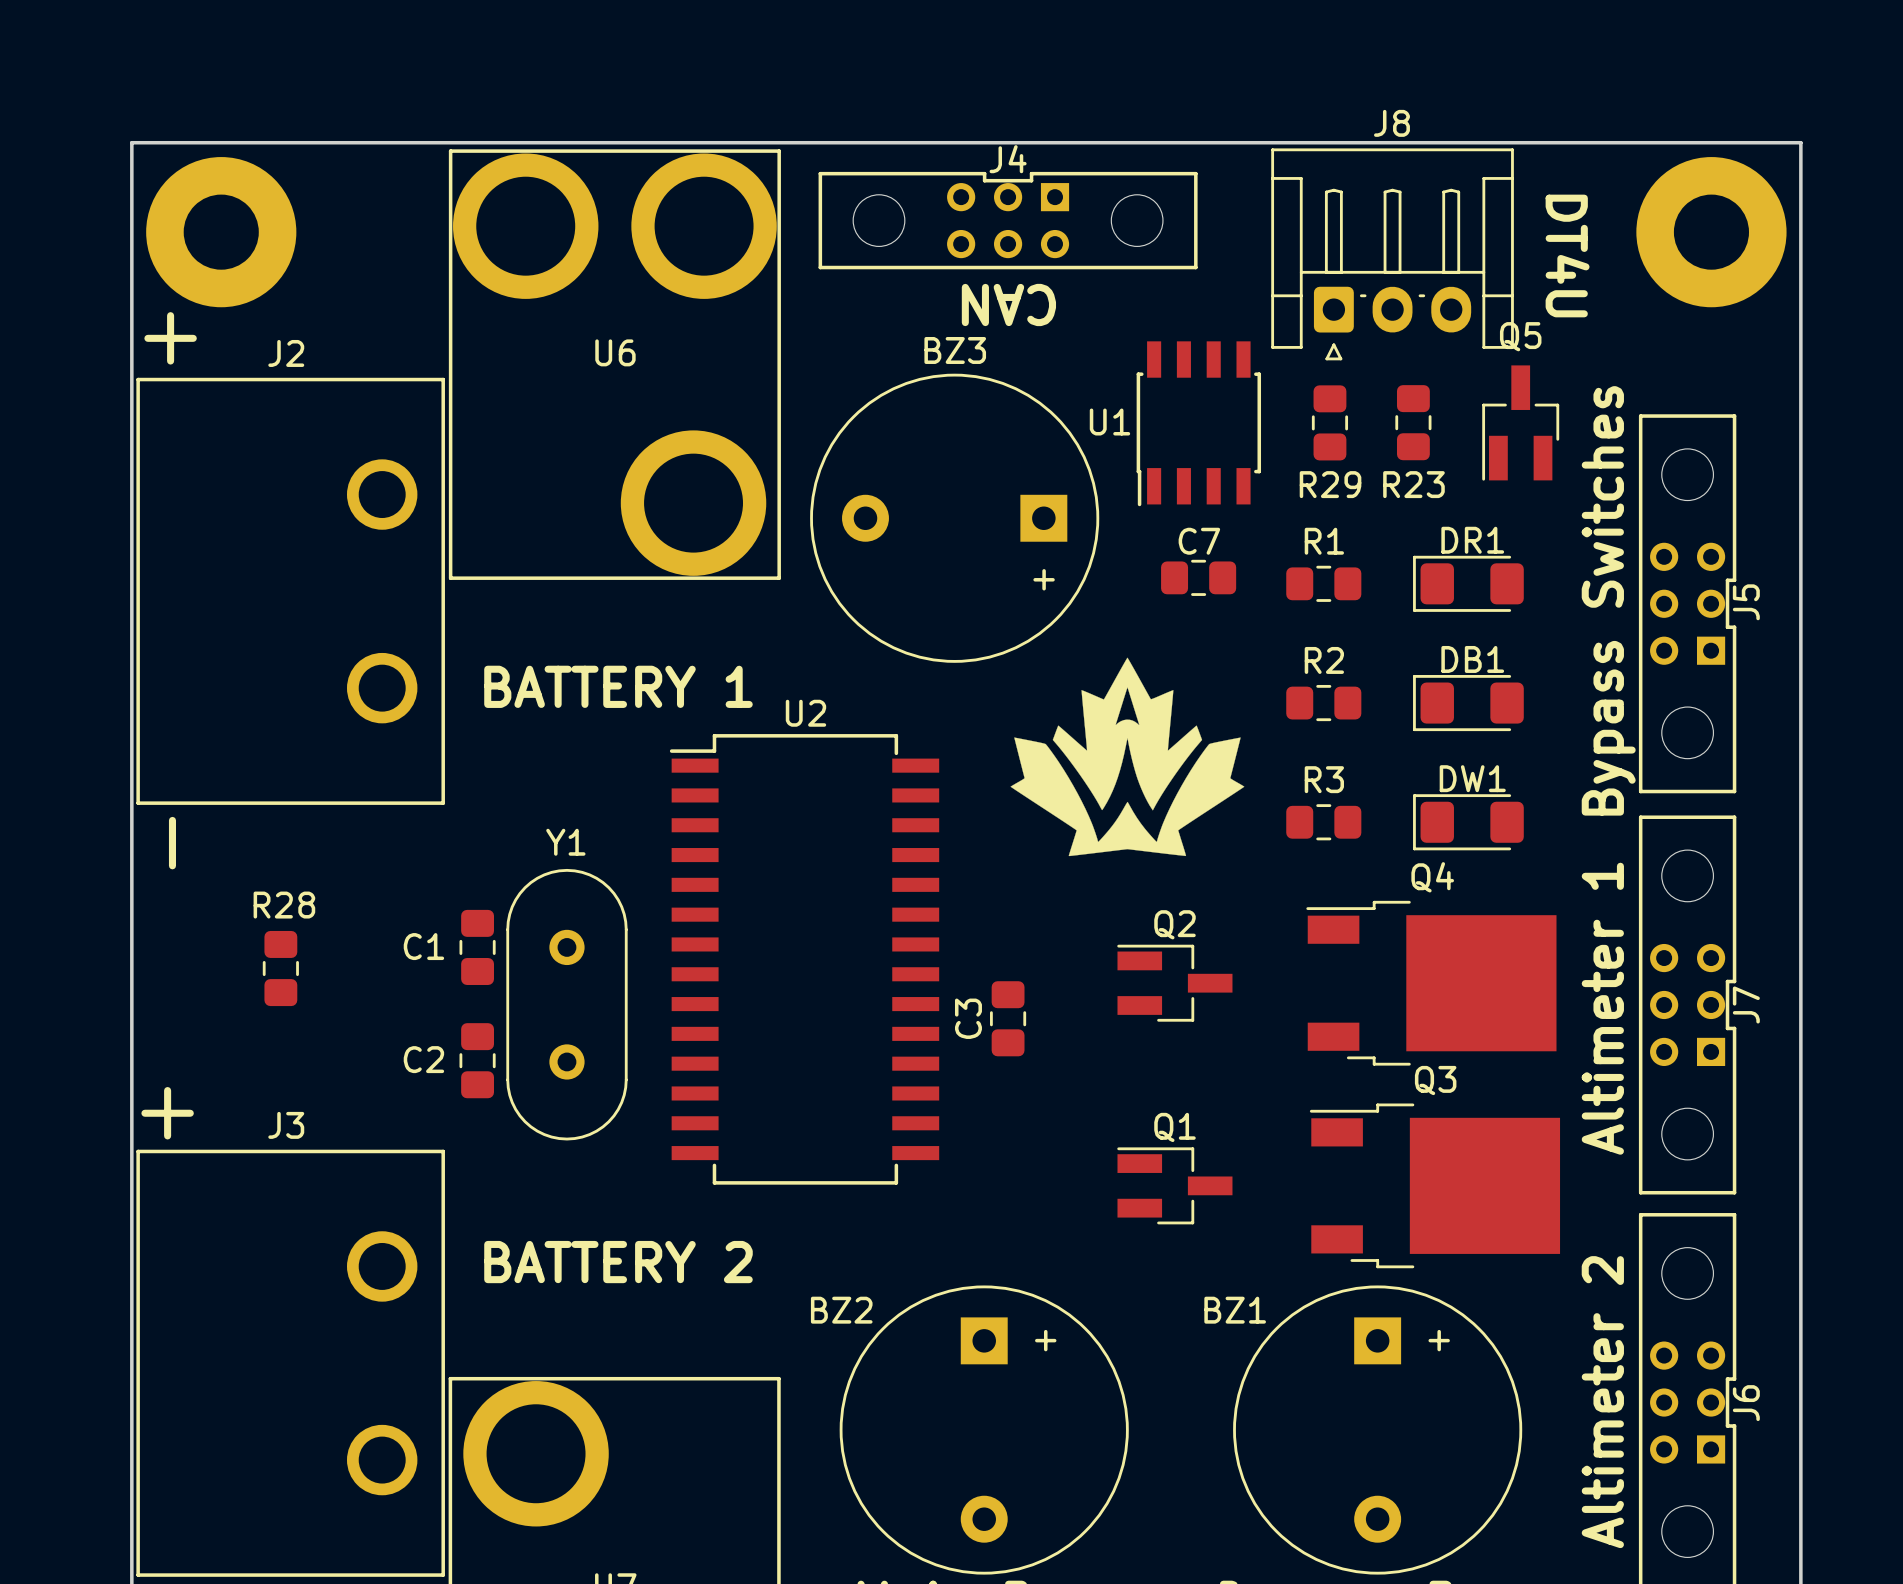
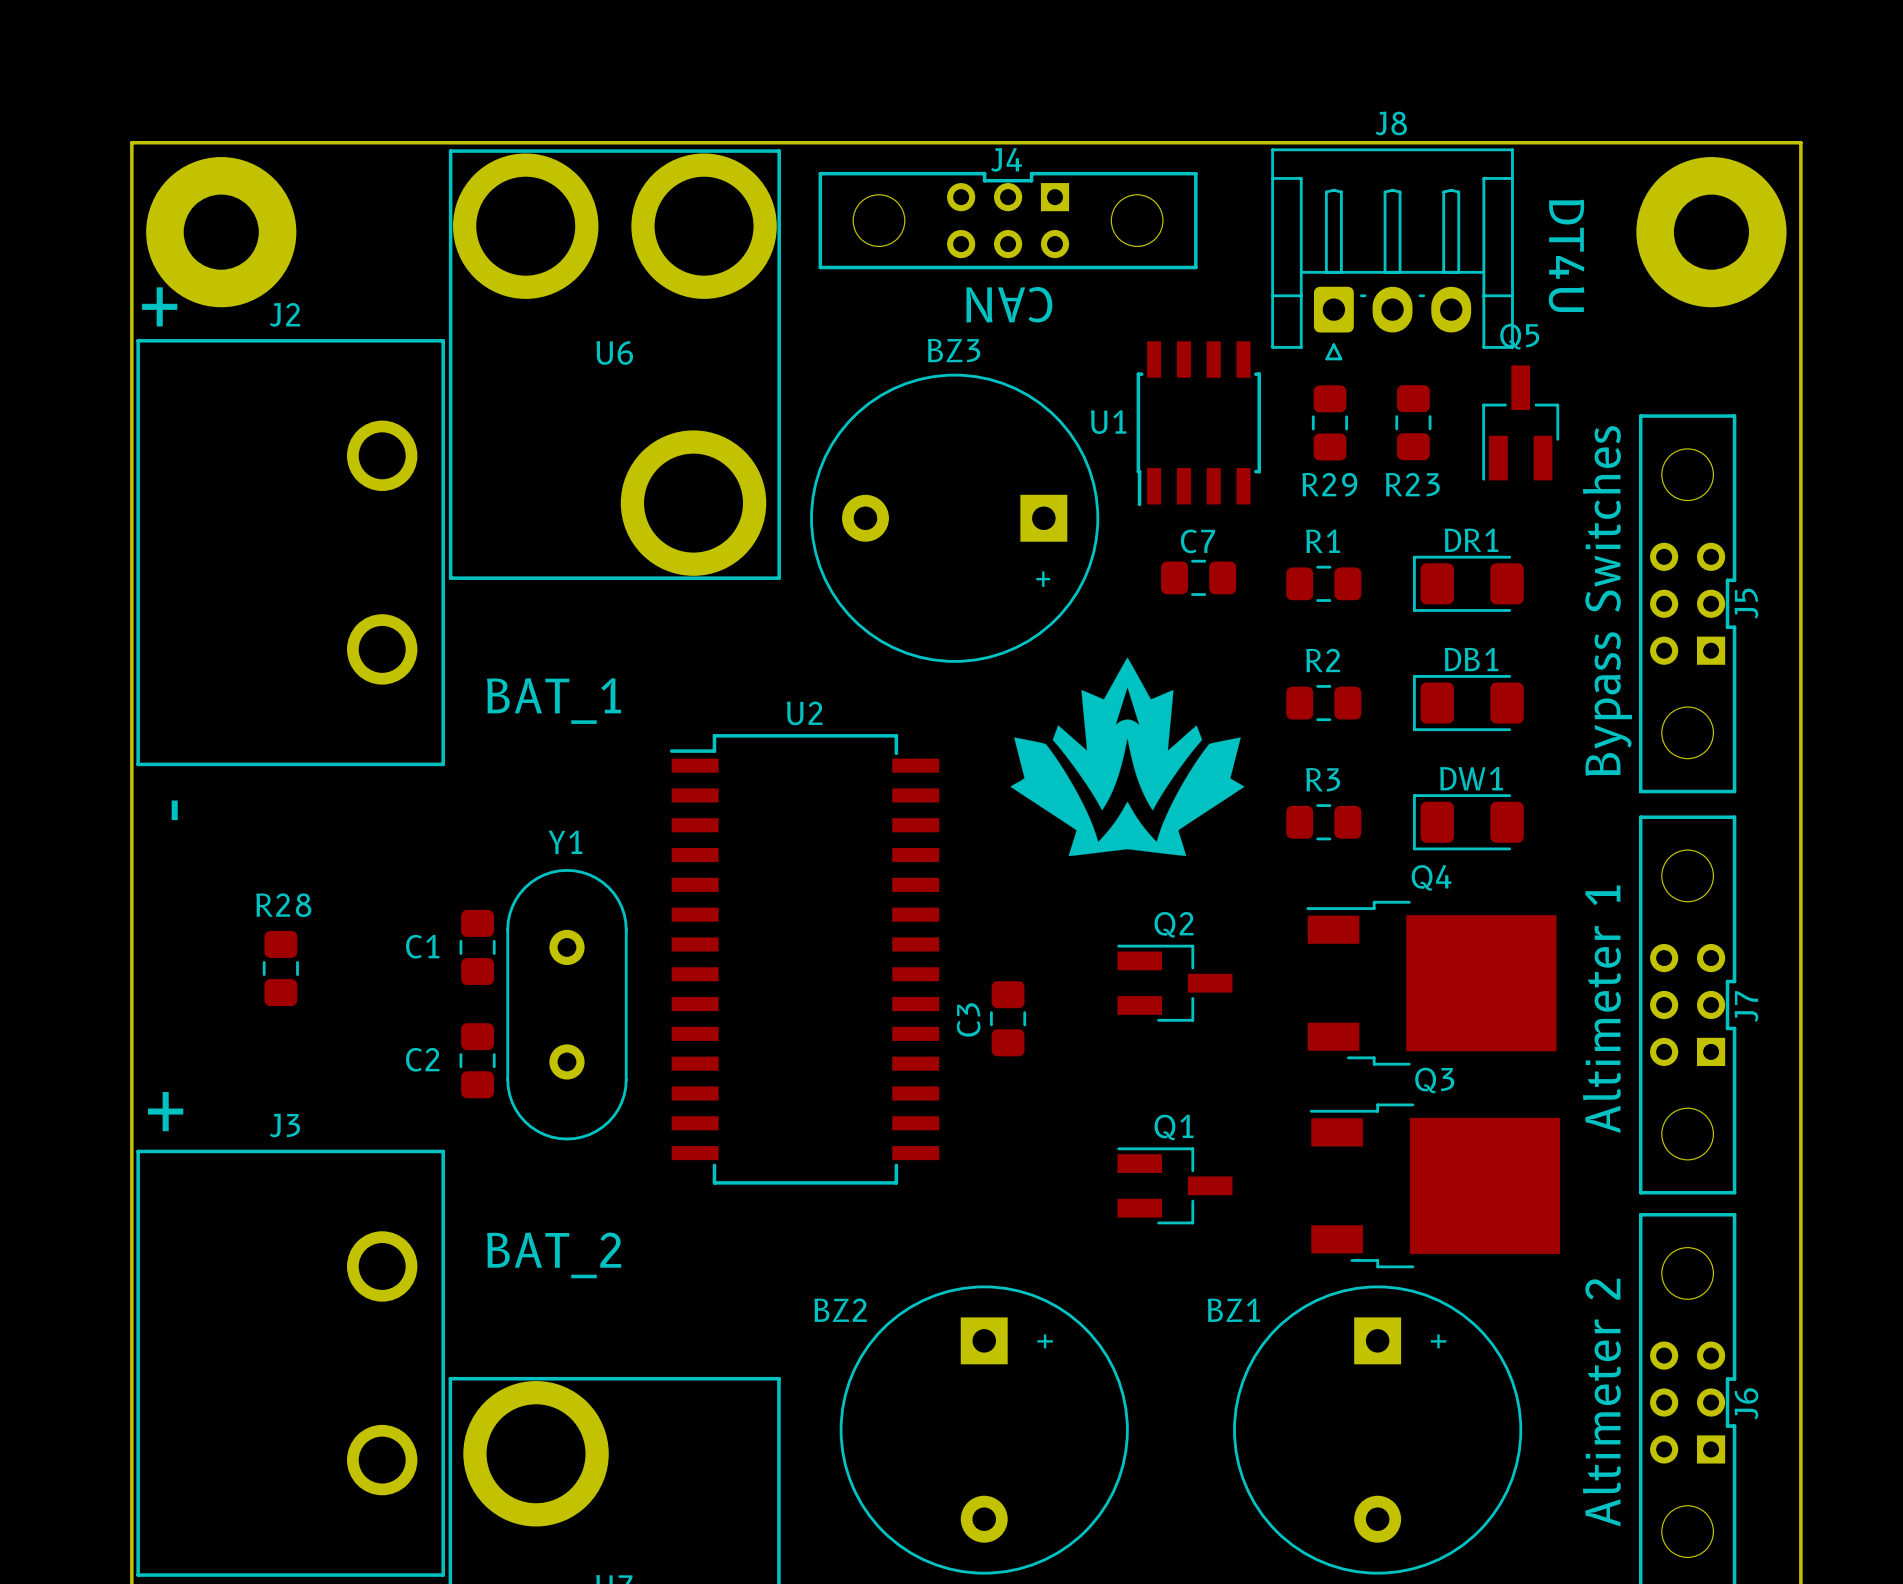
text position: + (170, 338) -> + (159, 306)
J2 position: (290, 591) -> (290, 552)
text: BATTERY 1 (618, 686) -> none
text: none -> BAT_1 (554, 701)
text position: - (172, 843) -> - (174, 810)
text: none -> BAT_2 (554, 1255)
text: BATTERY 2 (618, 1262) -> none

